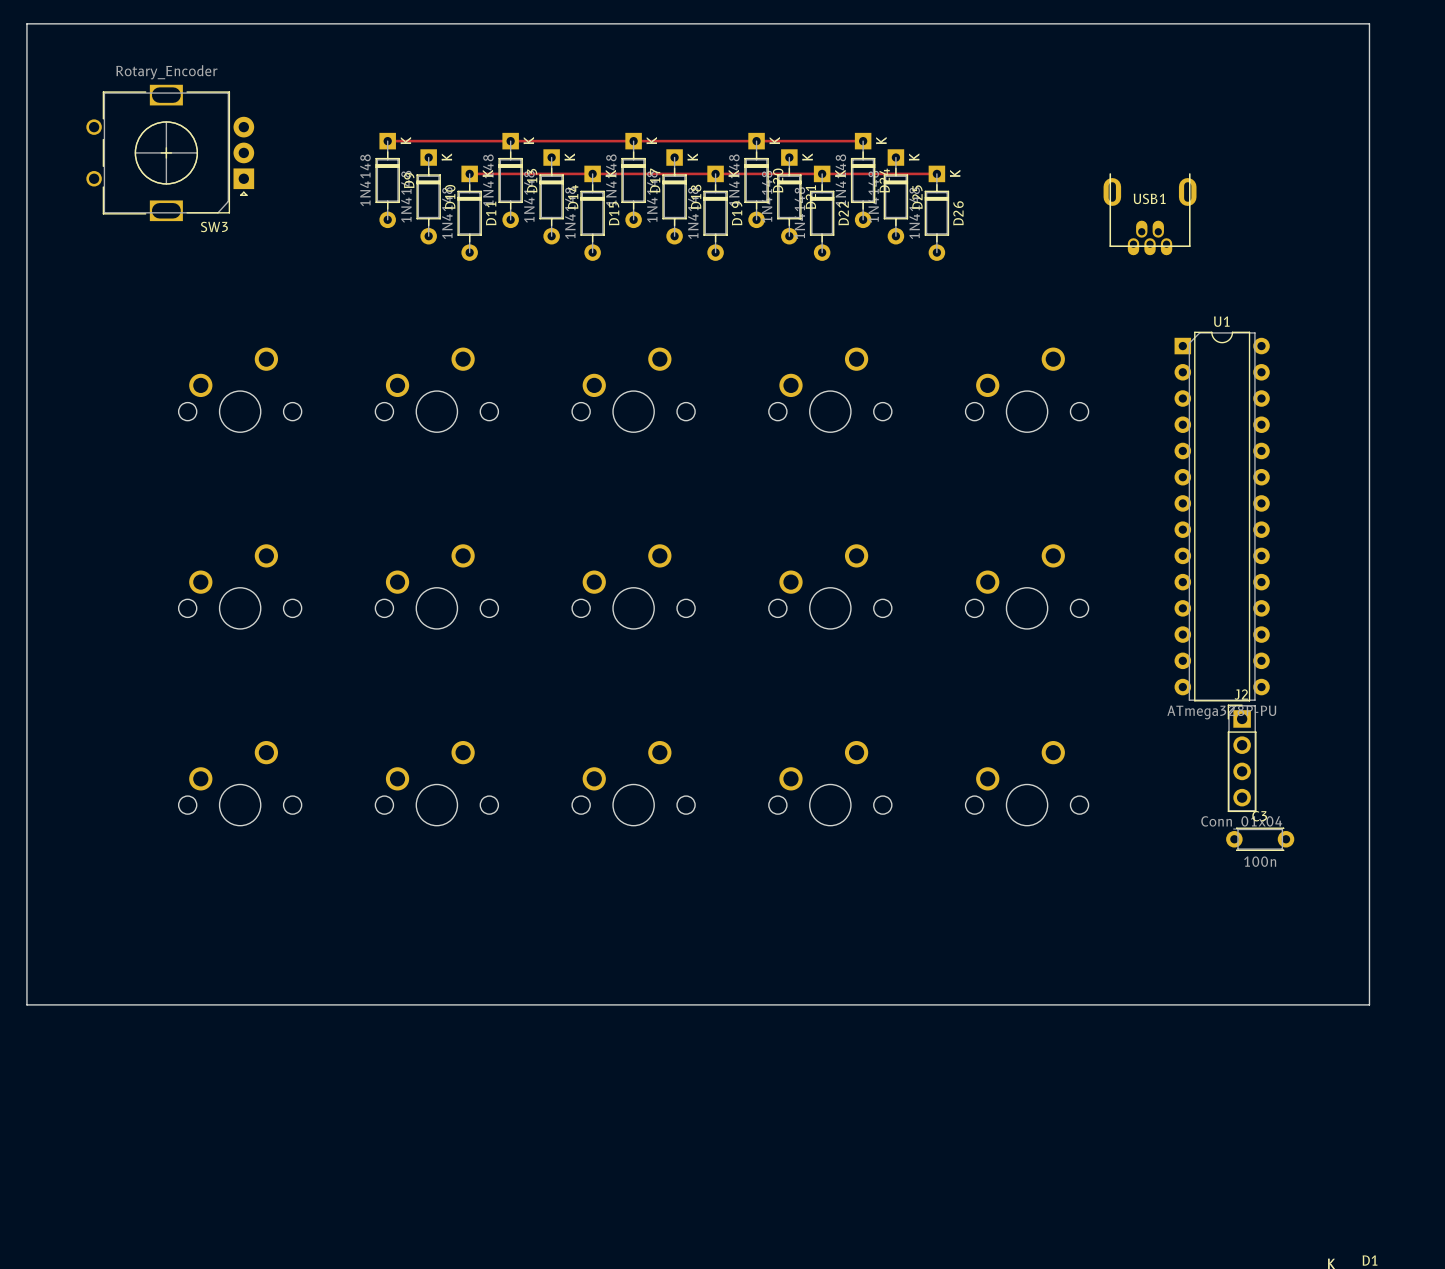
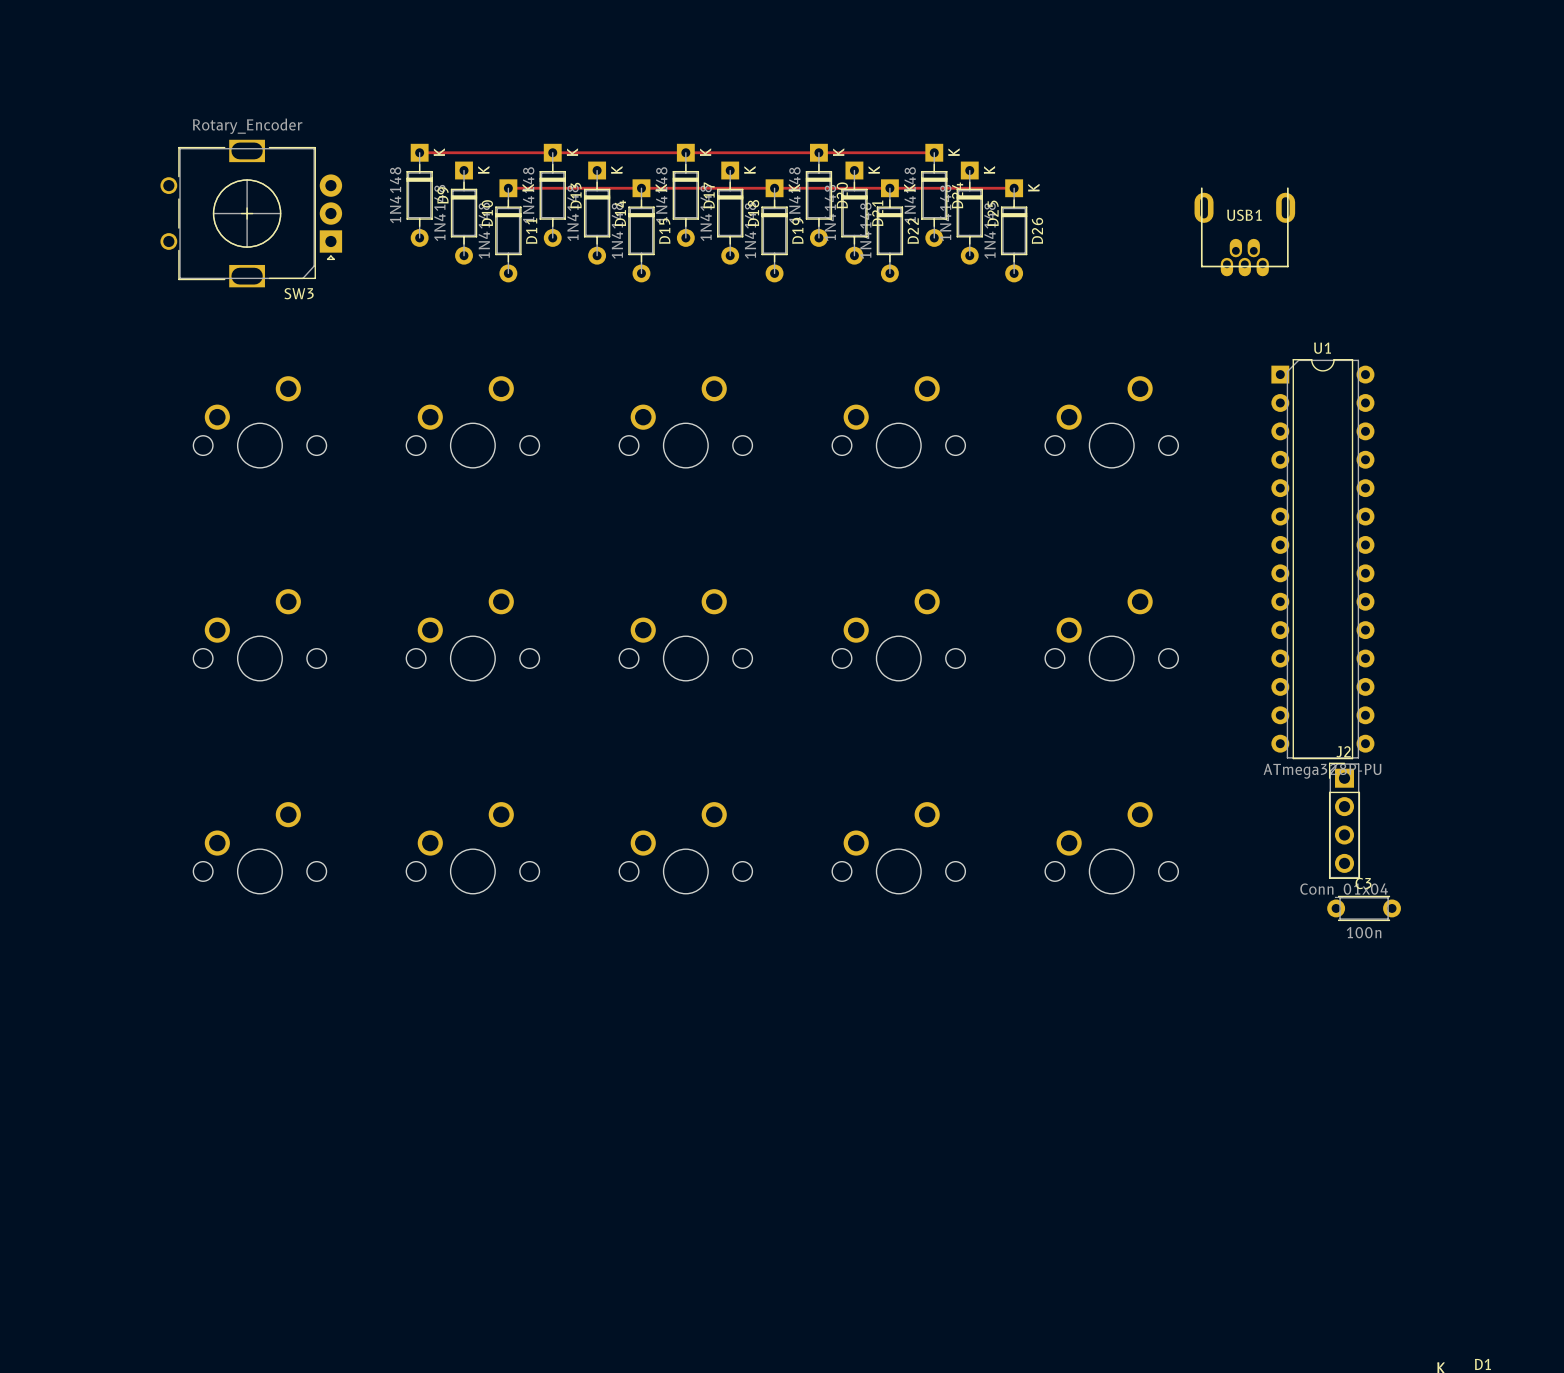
board edge: (26, 23) (26, 1004) (1369, 1004) (1369, 23) (26, 23) -> none
SW3 position: (170, 152) -> (251, 213)

